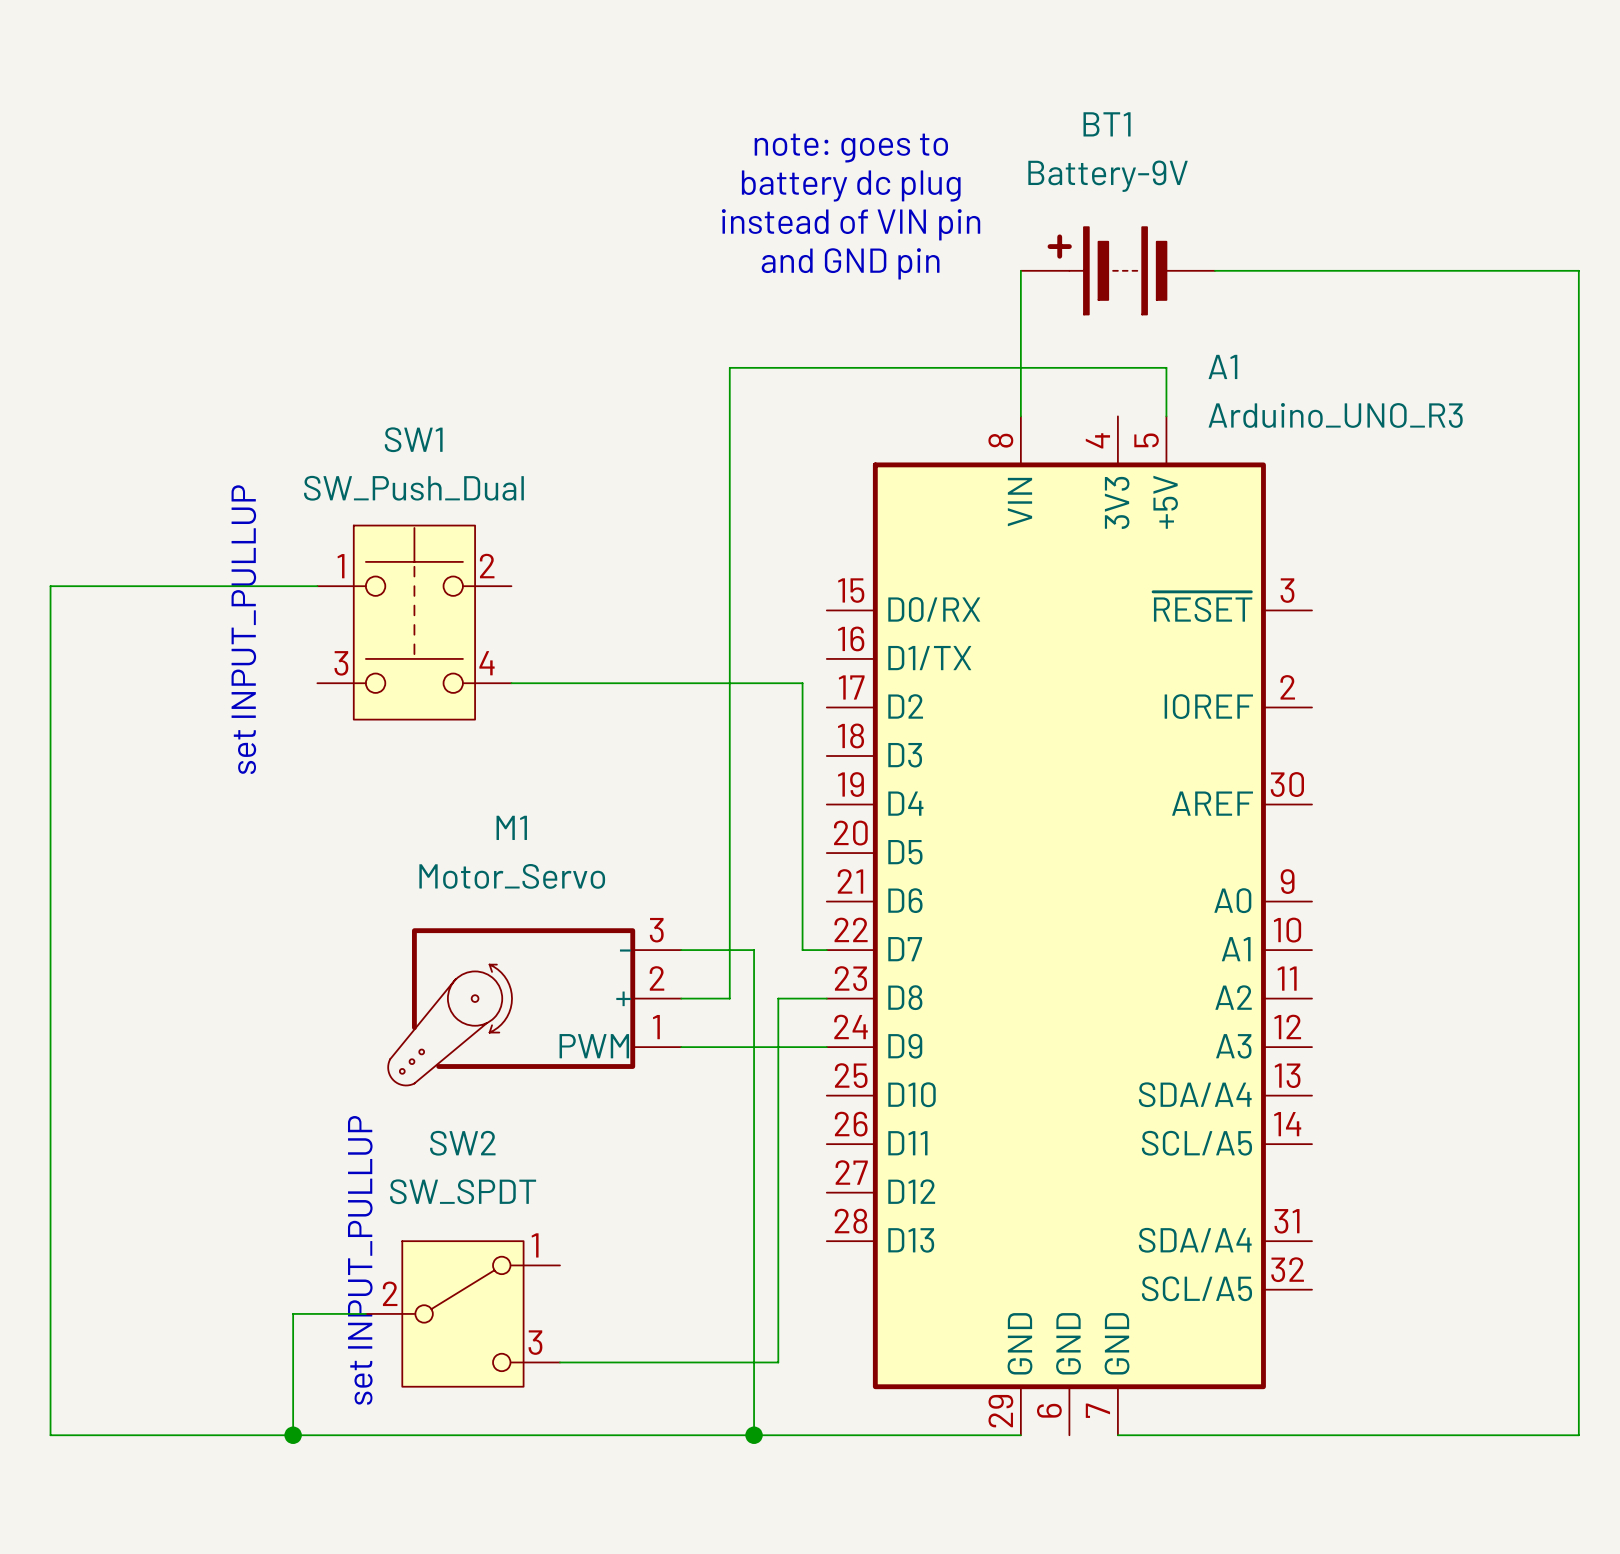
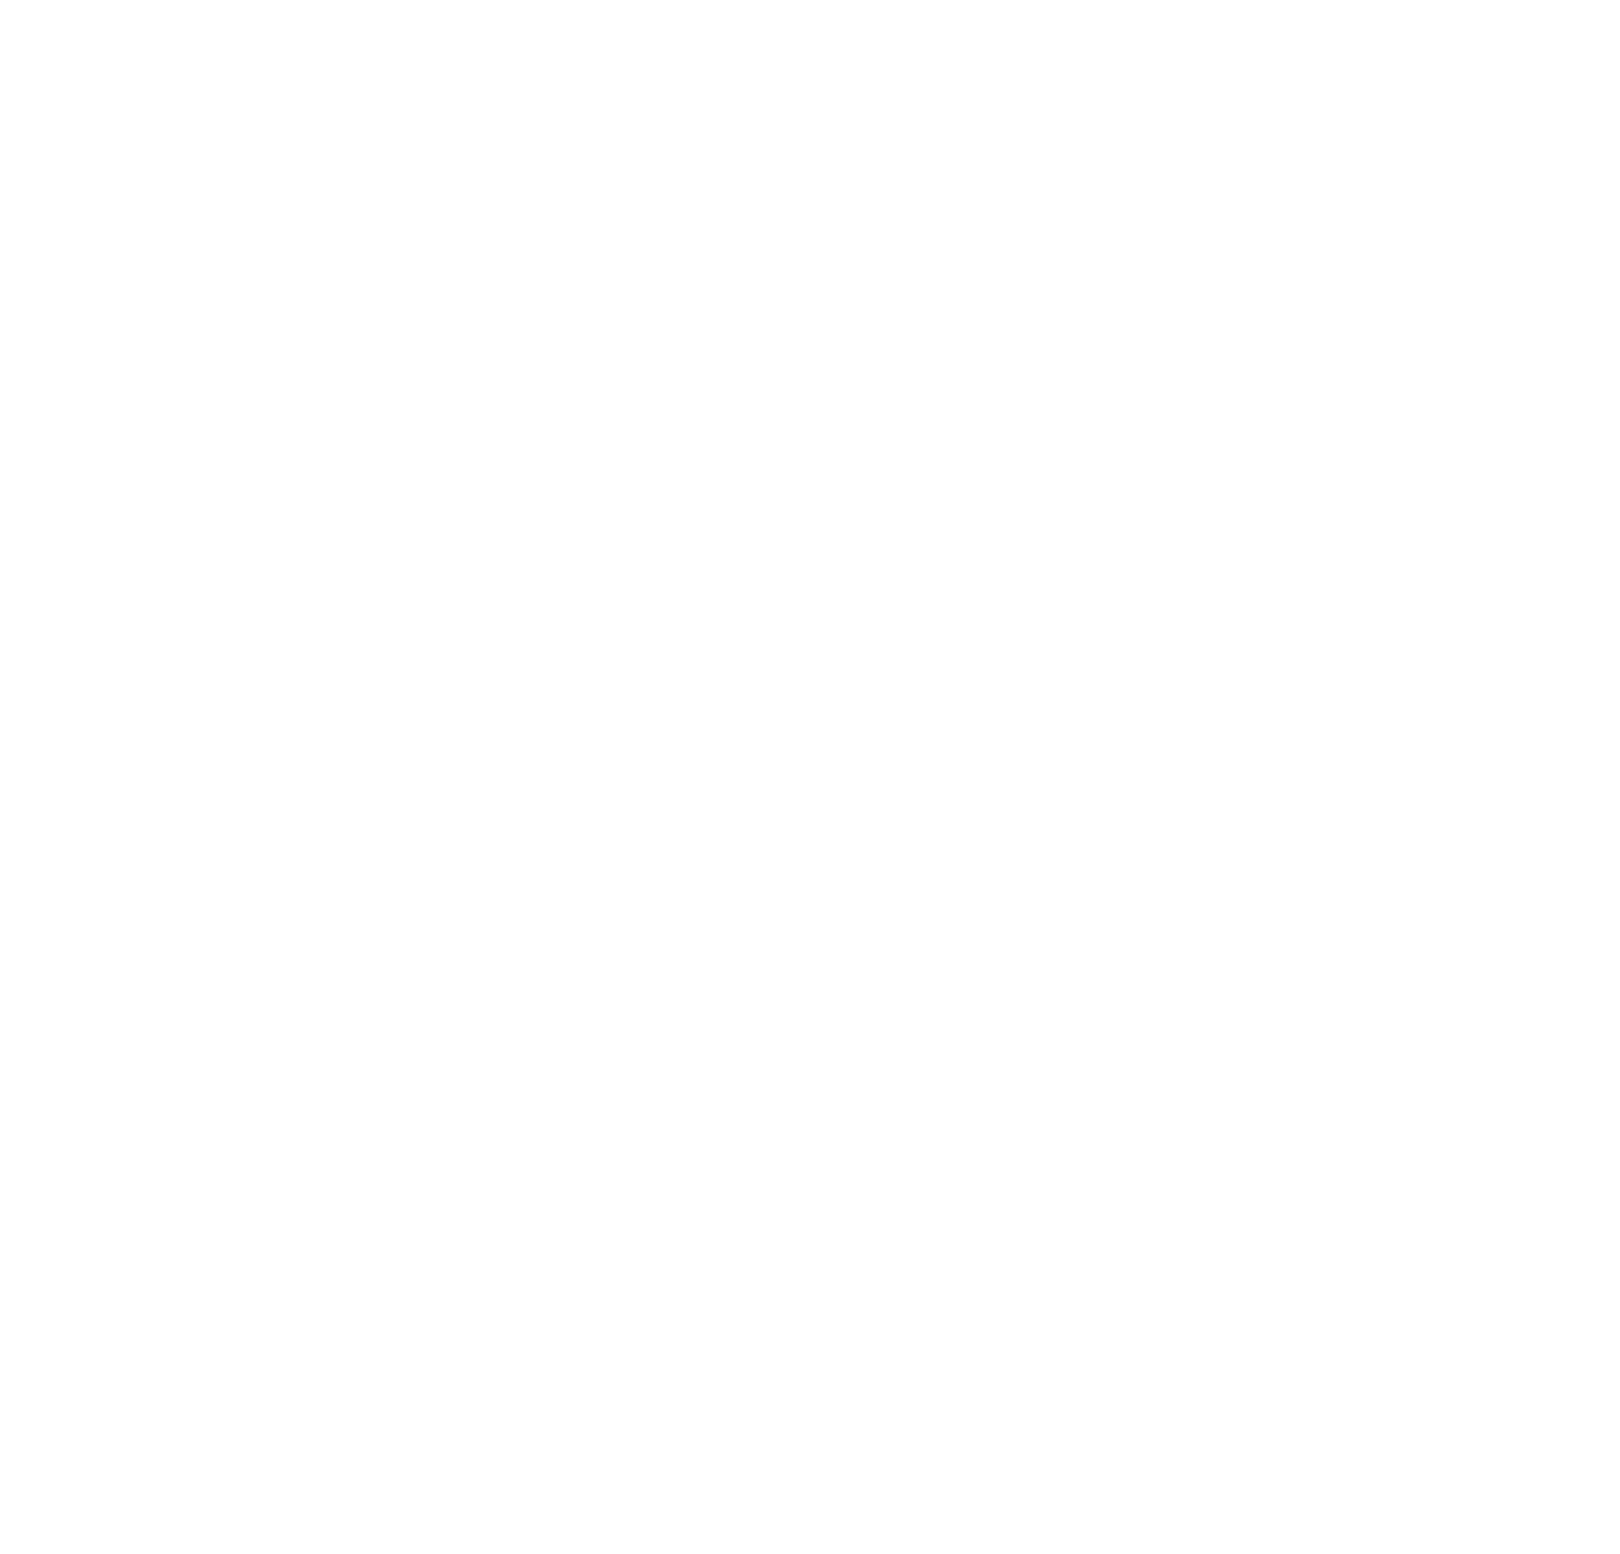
text: note: goes to (851, 148) -> none
text: battery dc plug (851, 186) -> none
text: instead of VIN pin (851, 224) -> none
text: and GND pin (850, 263) -> none
wire: (1020, 270) (1020, 416) -> none
BT1: Battery-9V (1117, 270) -> none
wire: (1214, 270) (1578, 270) (1578, 1435) (1117, 1435) -> none
wire: (1166, 416) (1166, 367) (729, 367) (729, 998) (681, 998) -> none
wire: (317, 586) (50, 586) (50, 1435) (1020, 1435) -> none
SW1: SW_Push_Dual (414, 622) -> none
text: set INPUT_PULLUP (243, 629) -> none
wire: (511, 683) (802, 683) (802, 950) (826, 950) -> none
A1: Arduino_UNO_R3 (1069, 925) -> none
wire: (681, 950) (754, 950) (754, 1435) -> none
wire: (826, 998) (778, 998) (778, 1362) (559, 1362) -> none
M1: Motor_Servo (534, 1006) -> none
wire: (681, 1047) (826, 1047) -> none
text: set INPUT_PULLUP (360, 1260) -> none
wire: (365, 1313) (293, 1313) (293, 1435) -> none
SW2: SW_SPDT (462, 1313) -> none
junction: (293, 1435) -> none
junction: (754, 1435) -> none

